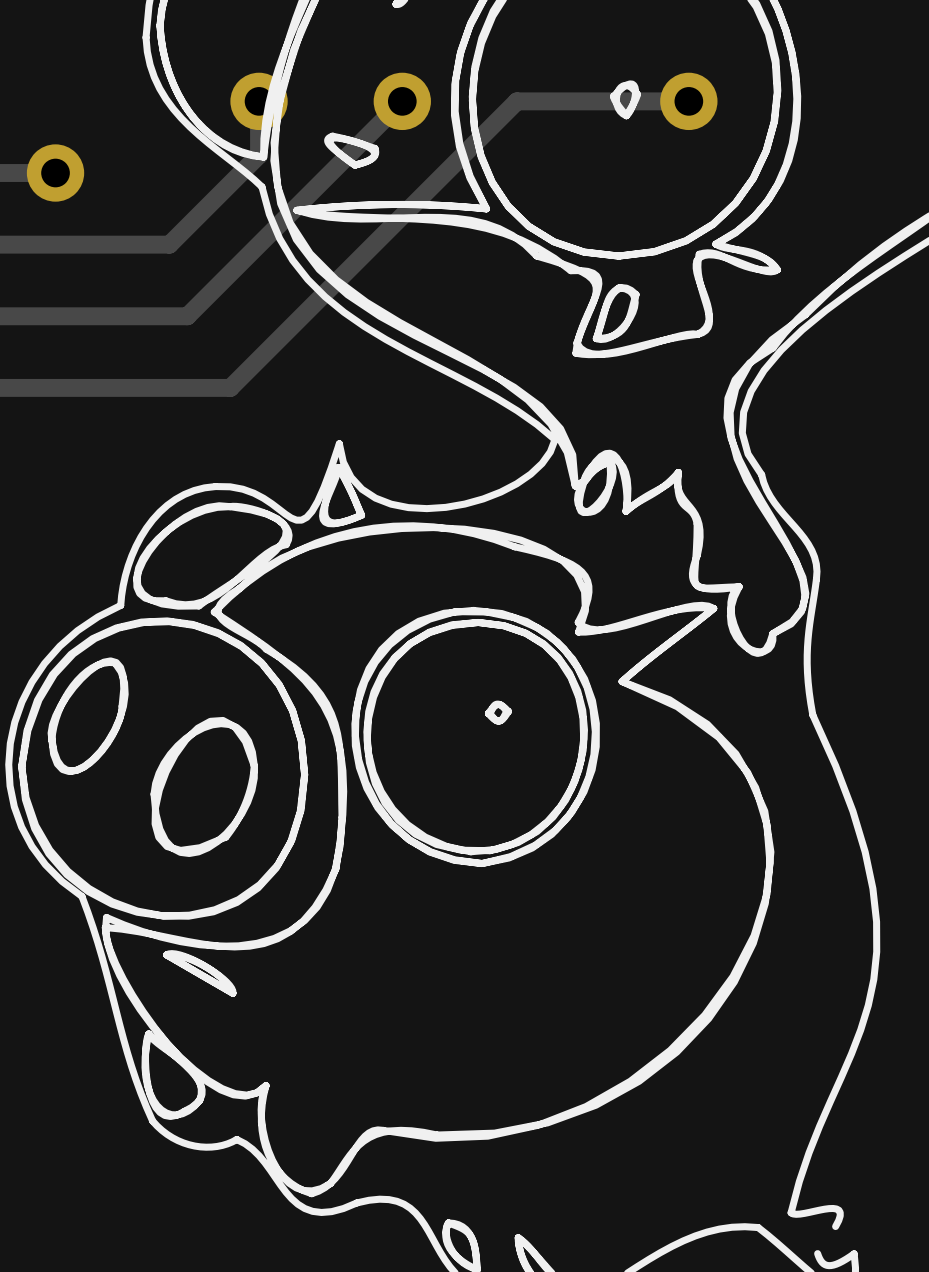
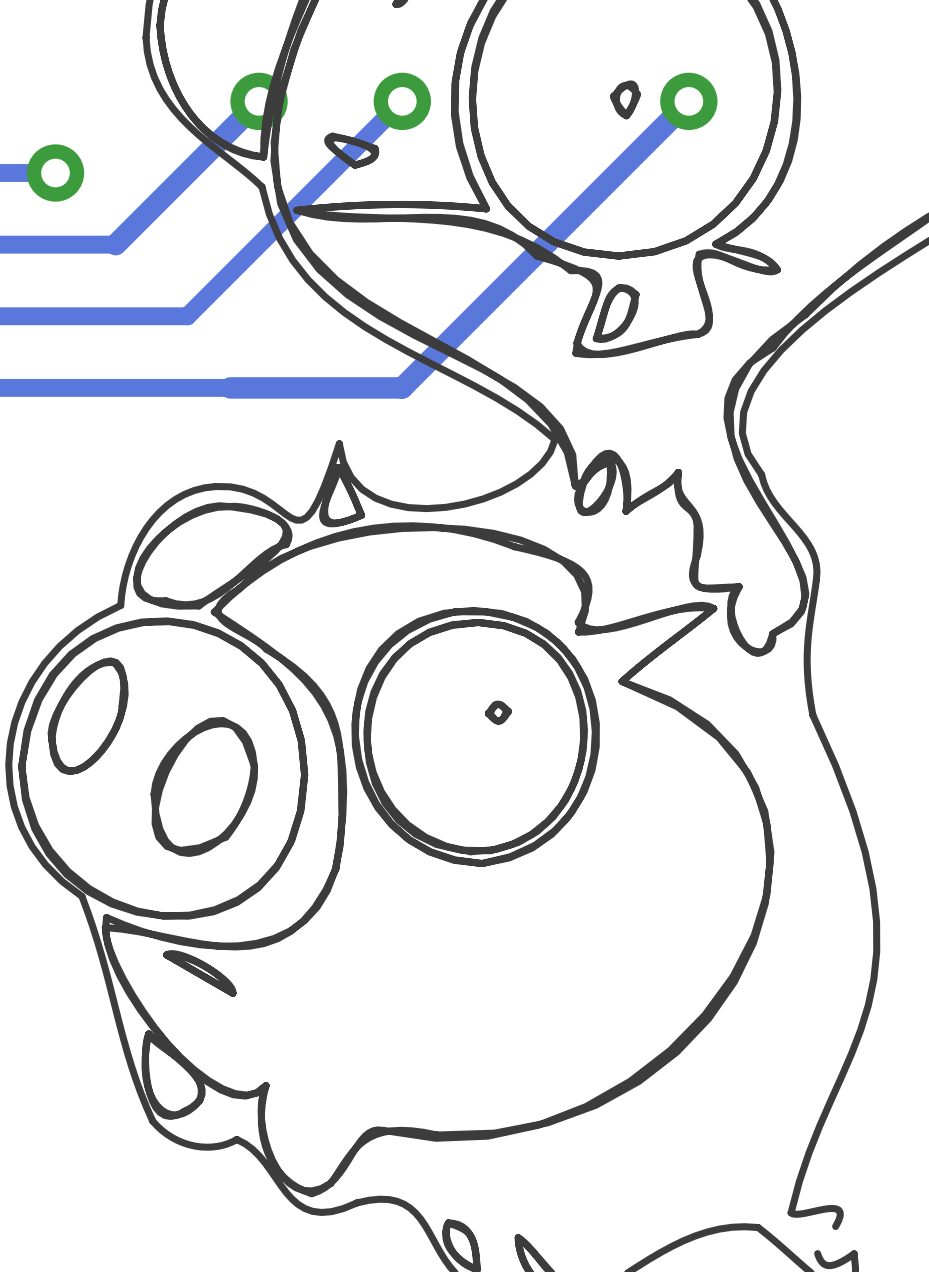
track: (259, 101) (259, 155) (169, 244) (115, 244) -> (259, 101) (115, 244)
track: (688, 101) (516, 101) (230, 387) -> (688, 101) (402, 387) (230, 387)

